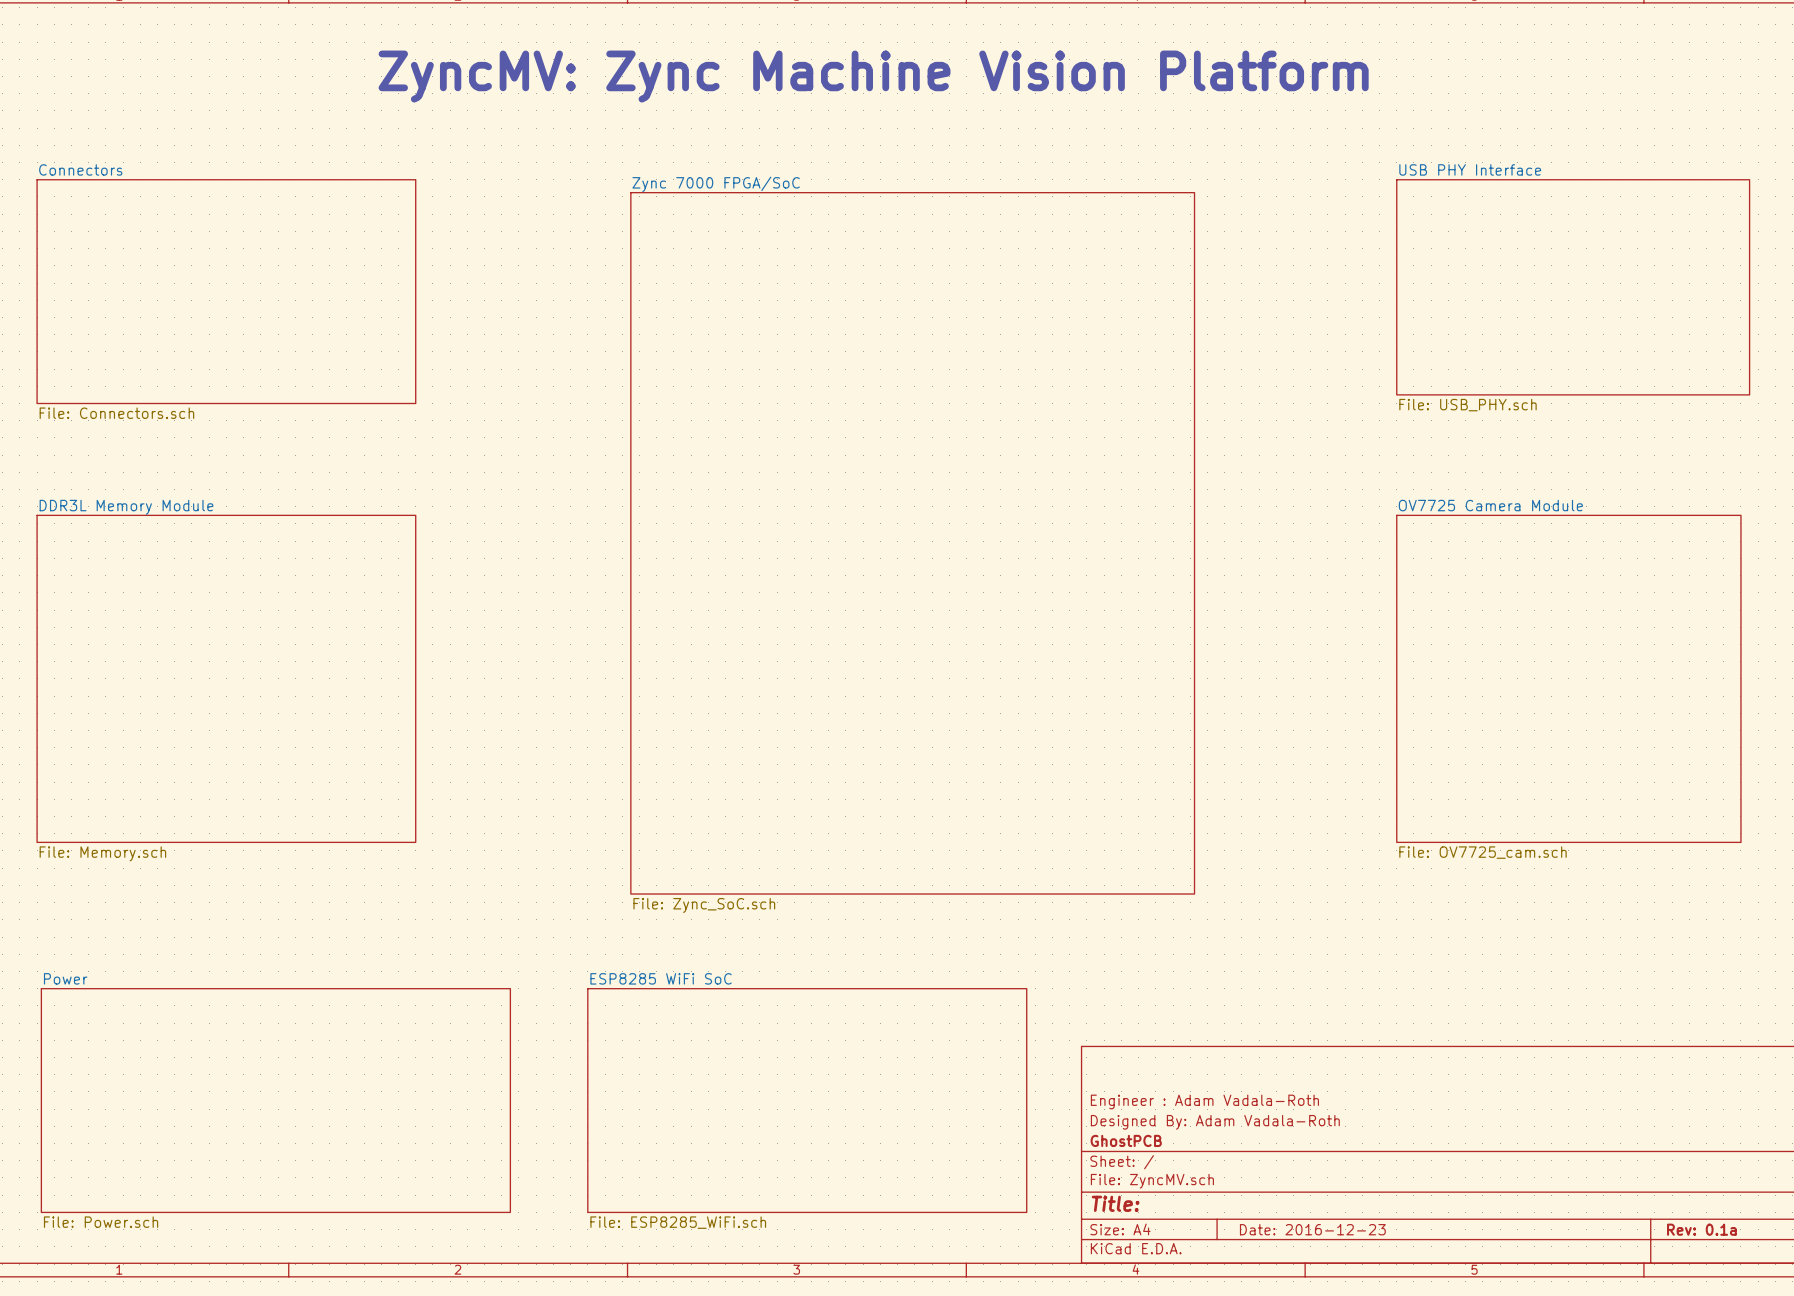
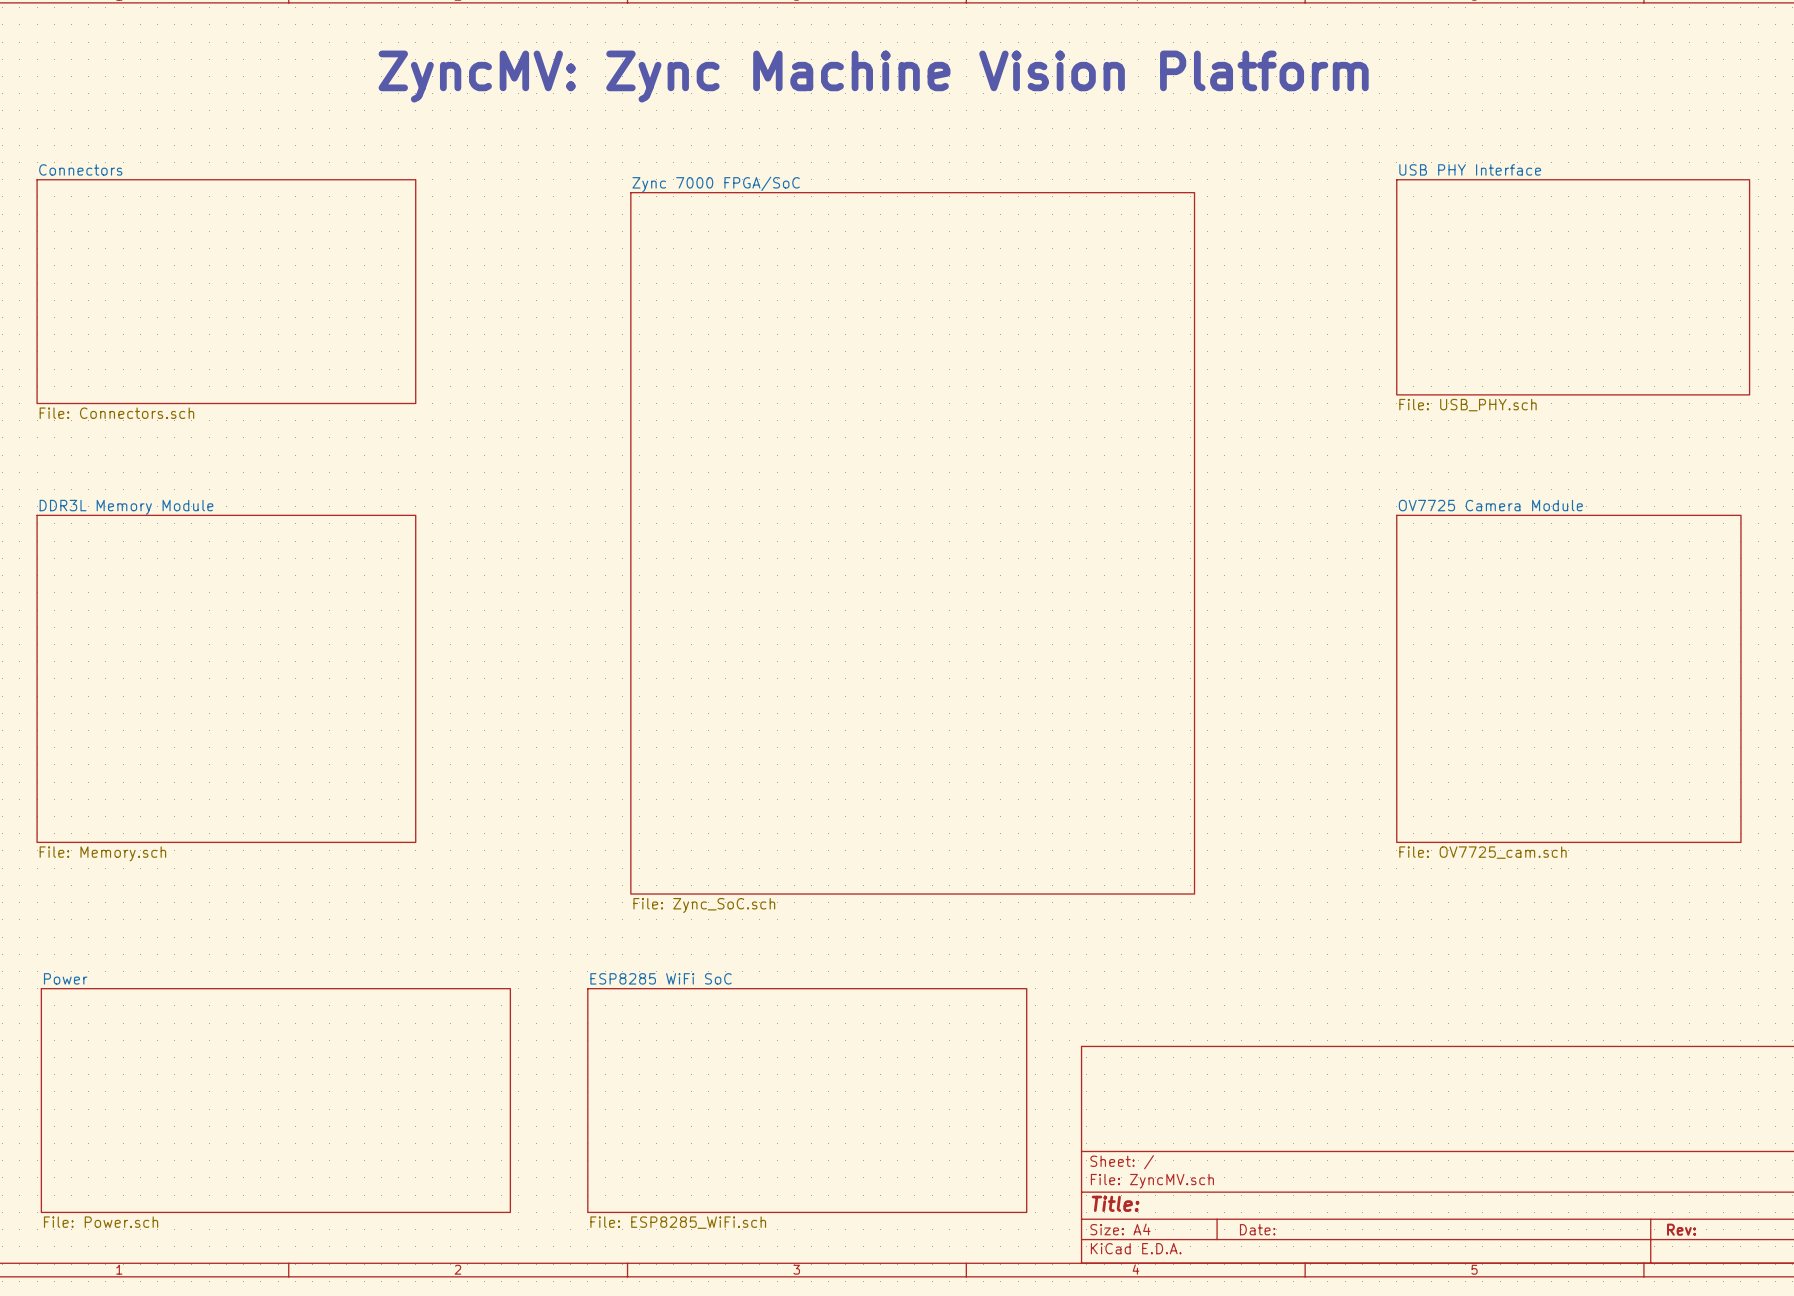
title block: Engineer : Adam Vadala-Roth (1204, 1101) -> none
title block: Designed By: Adam Vadala-Roth (1215, 1122) -> none
title block: GhostPCB (1126, 1140) -> none
title block: Date: 2016-12-23 (1312, 1229) -> Date: (1257, 1229)
title block: Rev: 0.1a (1701, 1229) -> Rev: (1681, 1229)

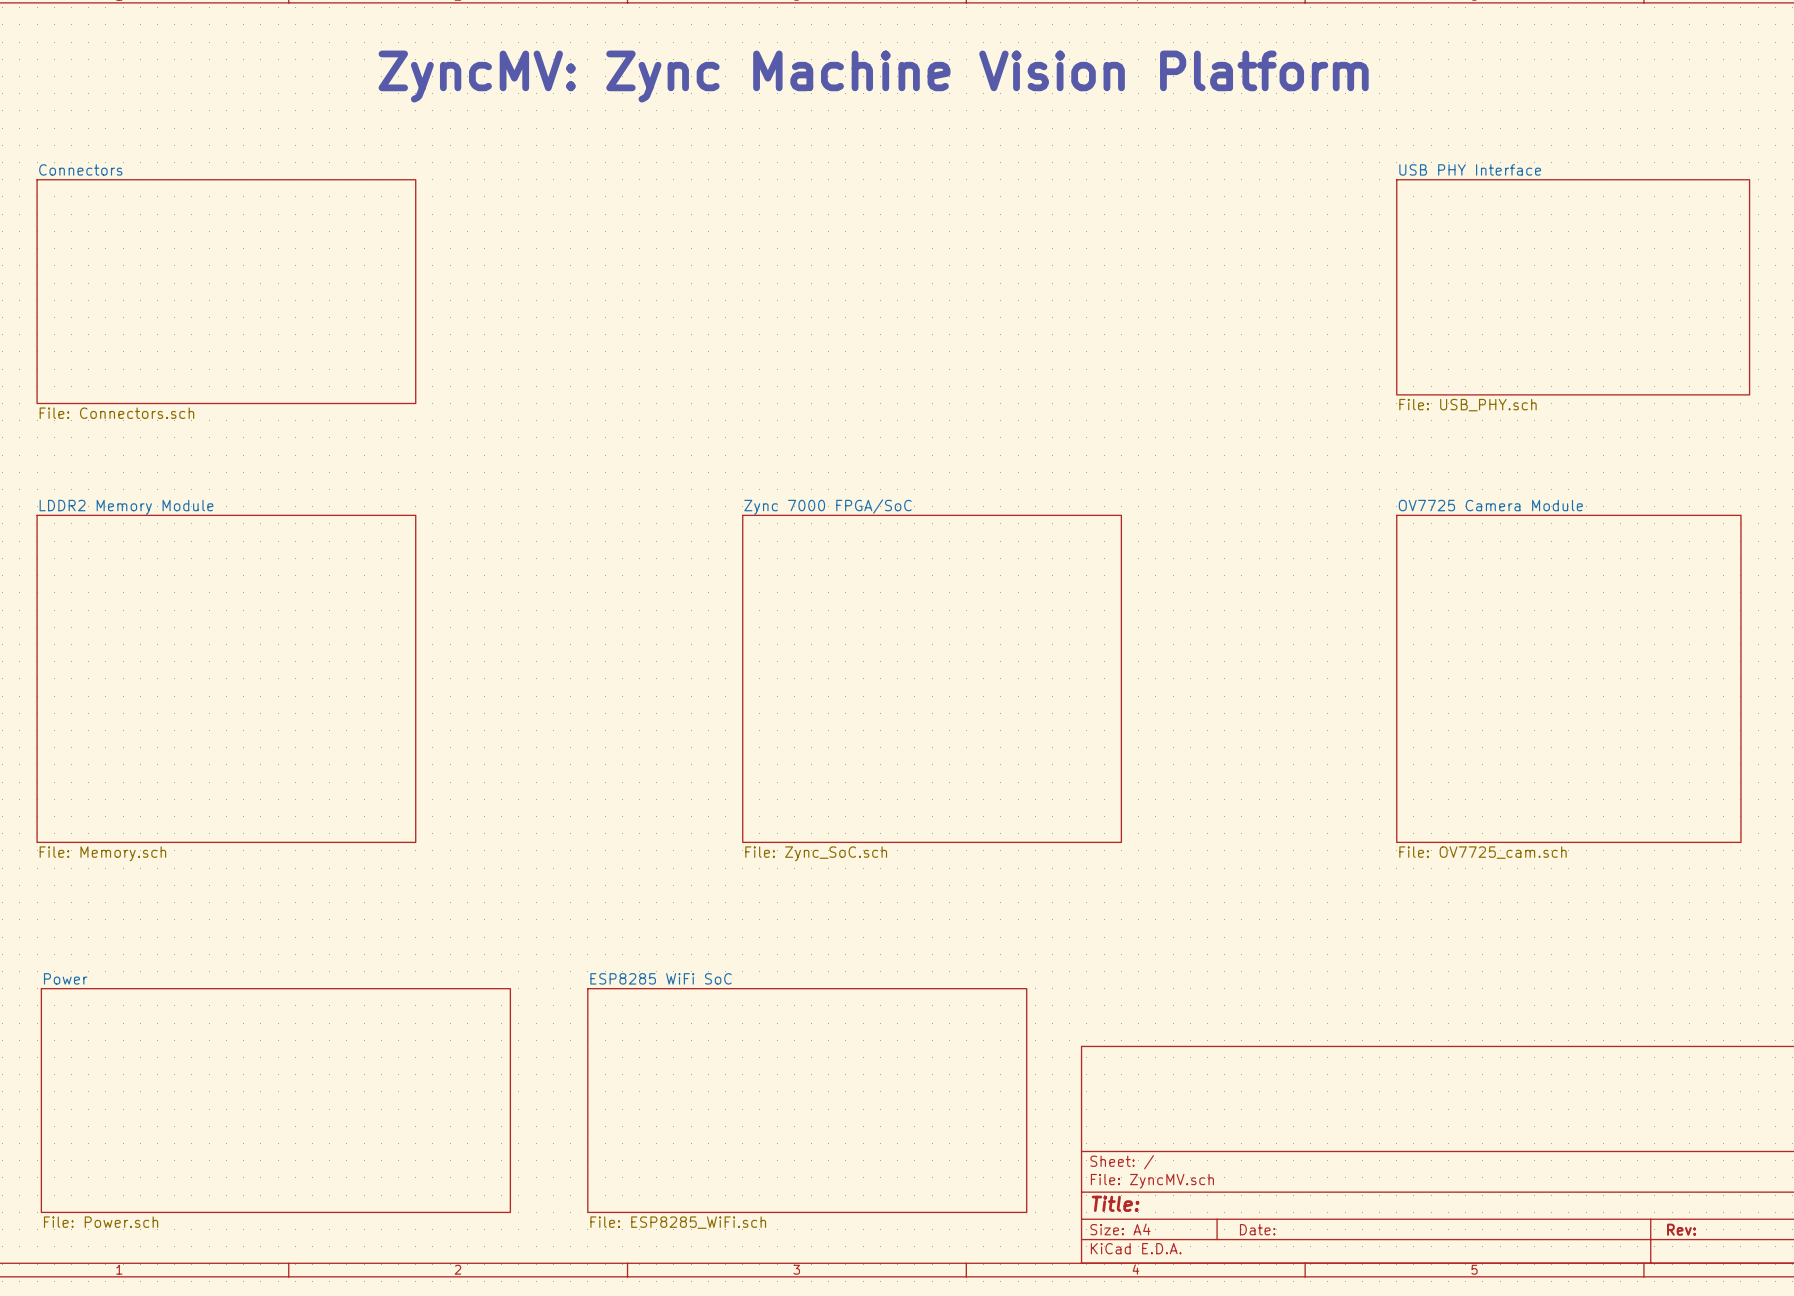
sheet Zync 7000 FPGA/SoC name position: Zync 7000 FPGA/SoC (716, 184) -> Zync 7000 FPGA/SoC (827, 507)
sheet Zync 7000 FPGA/SoC shape: [630, 192, 1195, 895] -> [742, 515, 1122, 843]
sheet DDR3L Memory Module name: DDR3L Memory Module (126, 507) -> LDDR2 Memory Module (126, 507)
sheet Zync 7000 FPGA/SoC value position: File: Zync_SoC.sch (704, 905) -> File: Zync_SoC.sch (816, 853)

